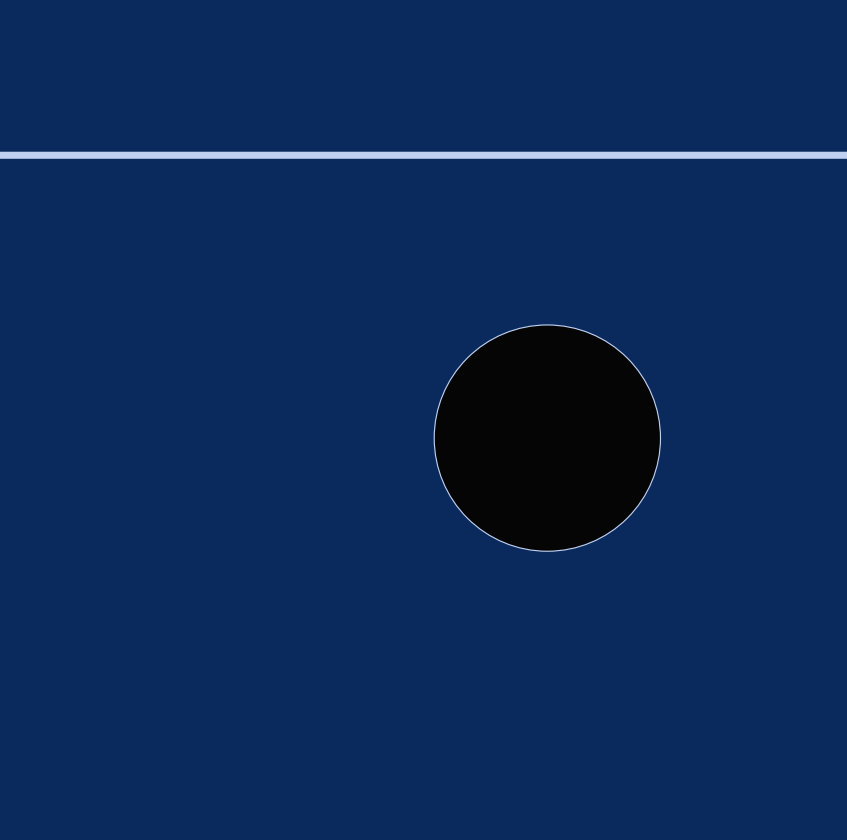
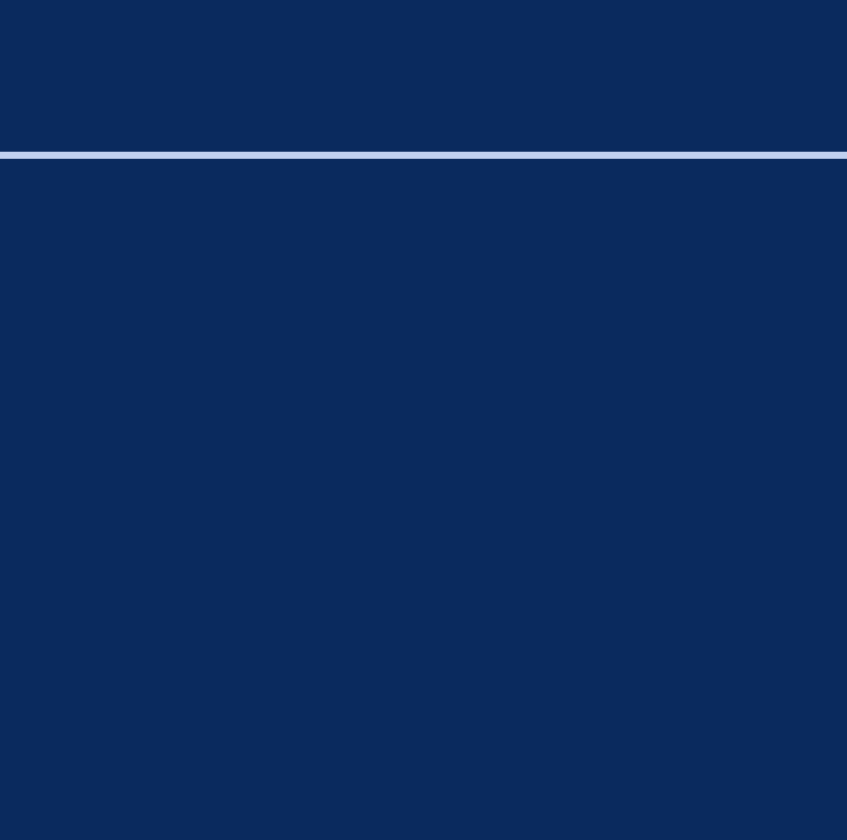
part: (547, 438) -> none

